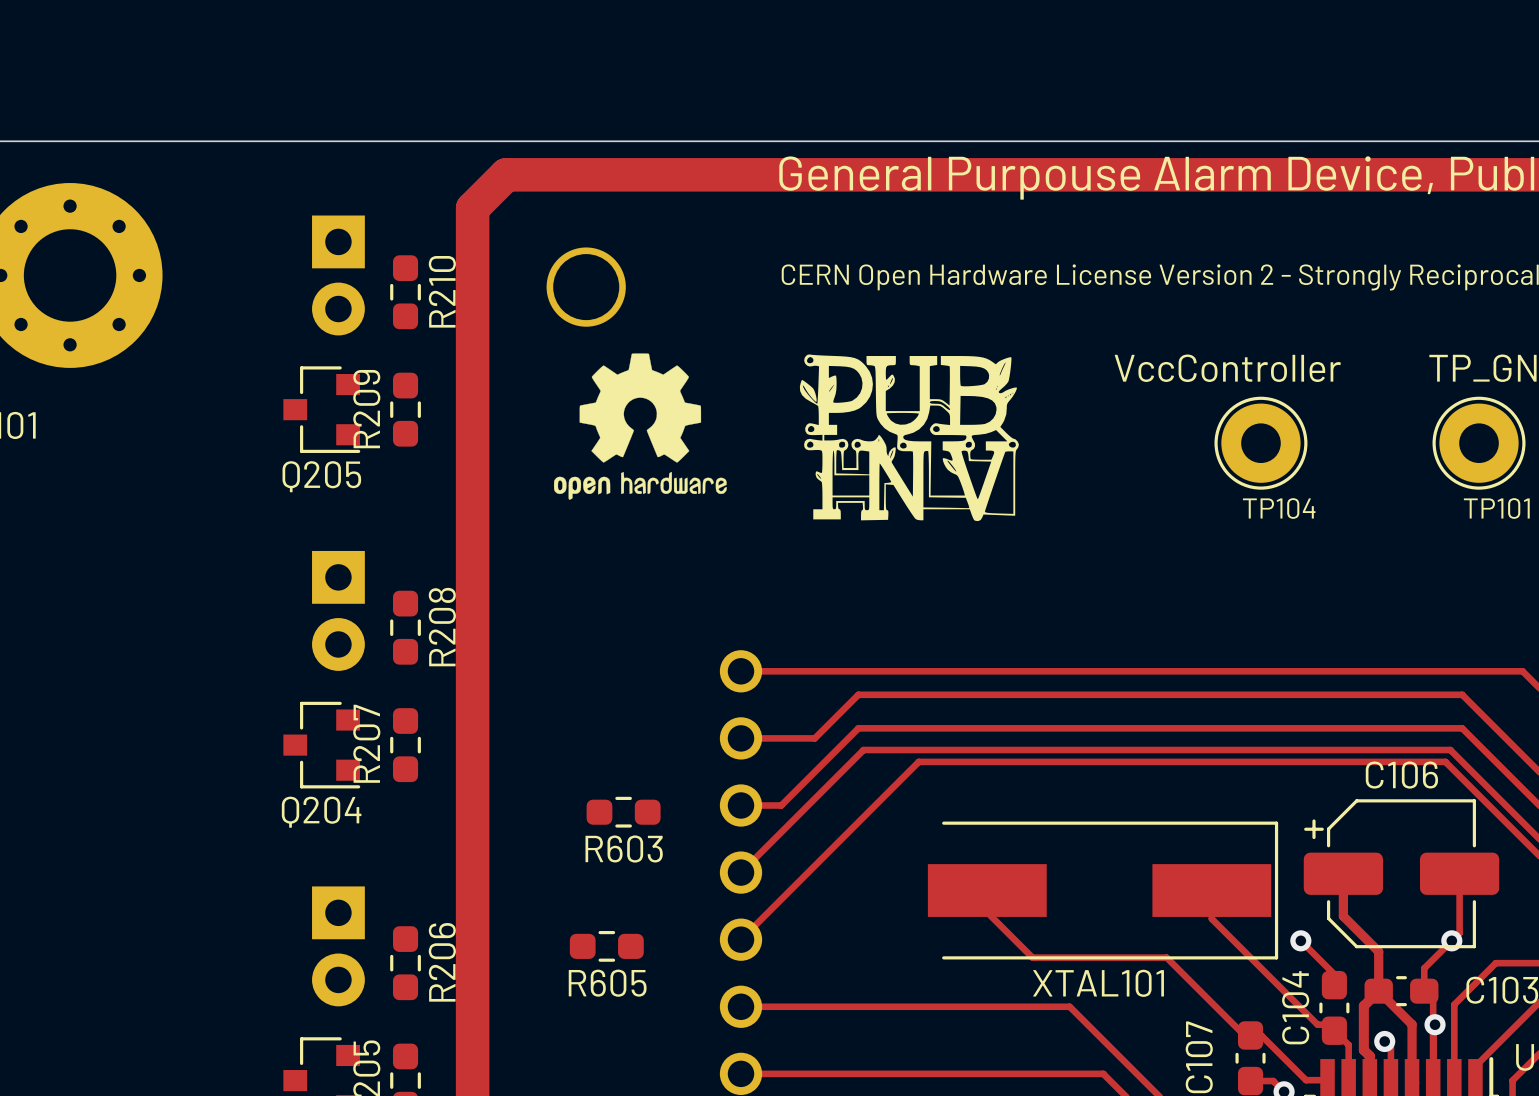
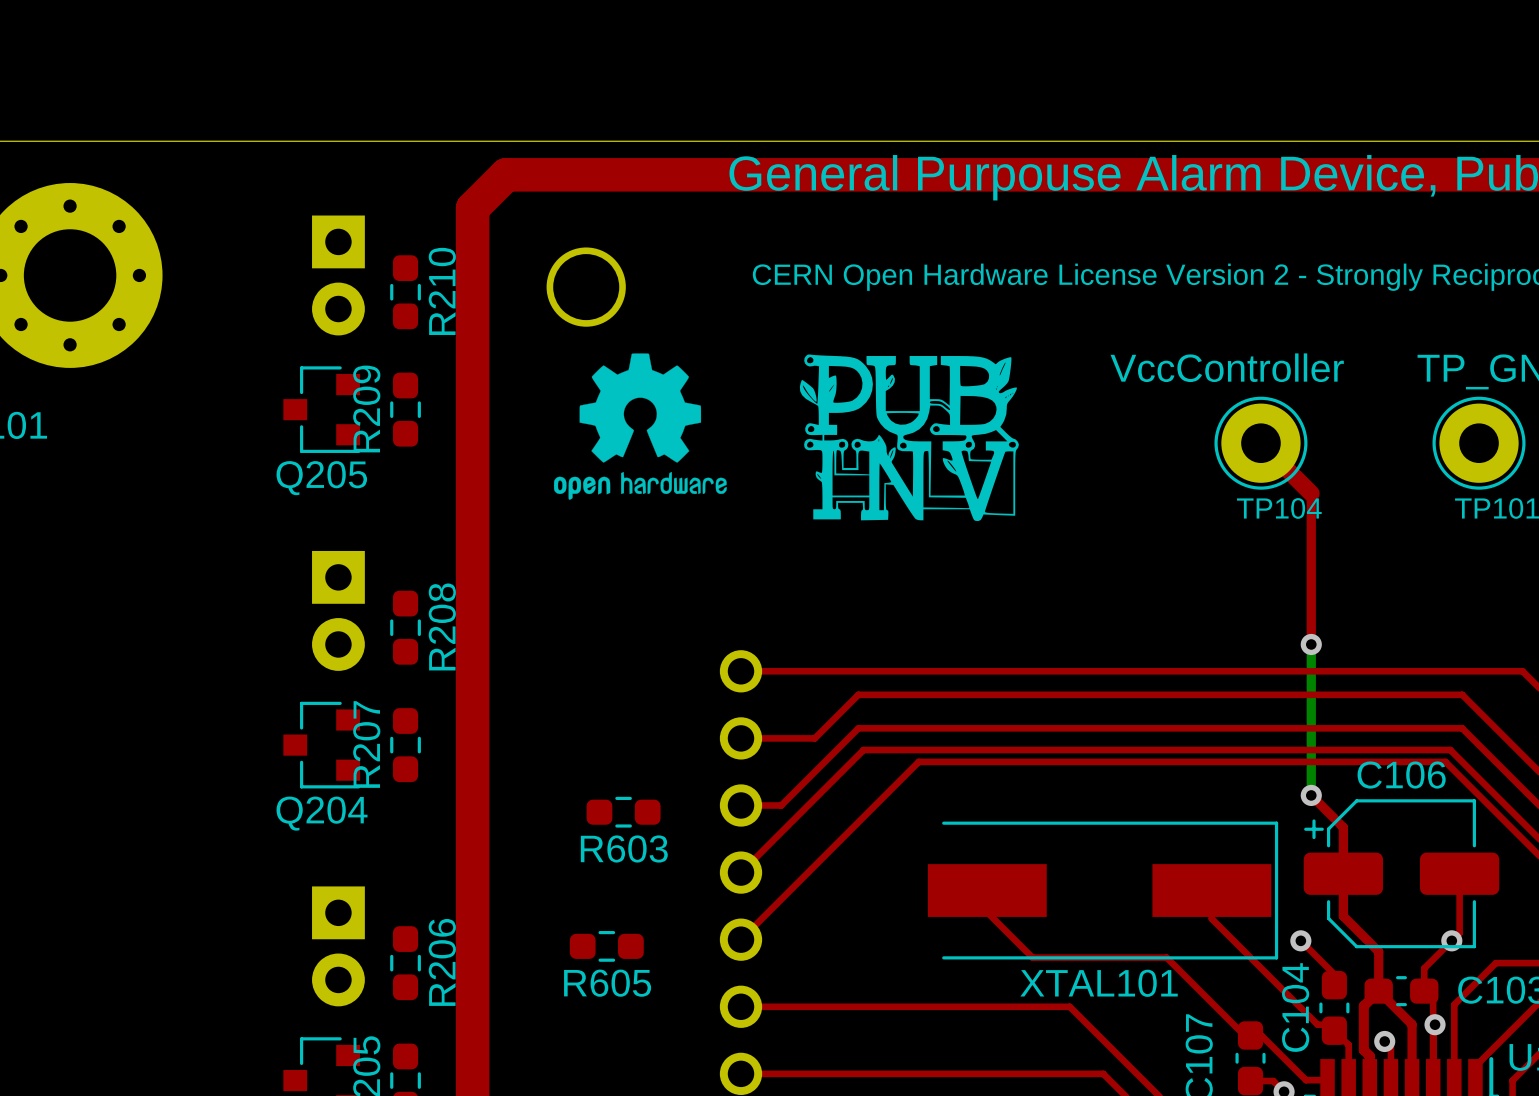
top track: none -> (1260, 443) (1311, 493) (1311, 644)
bottom track: none -> (1311, 644) (1311, 795)
via: none -> (1311, 644)
top track: none -> (1311, 795) (1343, 827) (1343, 873)
via: none -> (1311, 795)

